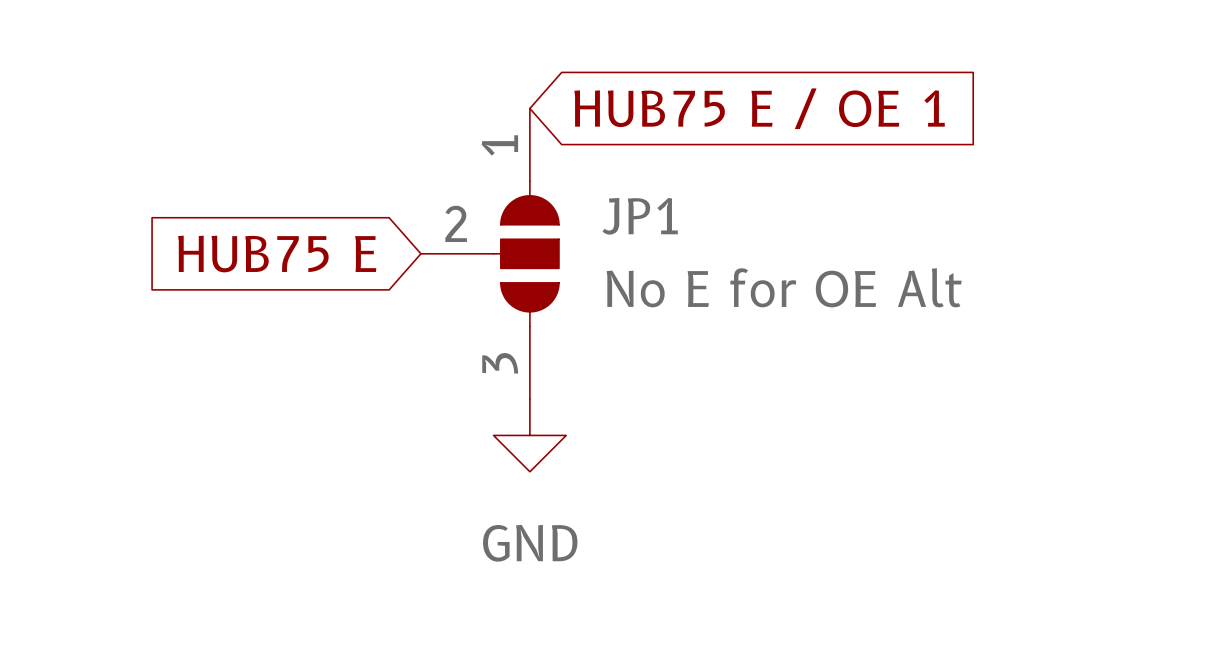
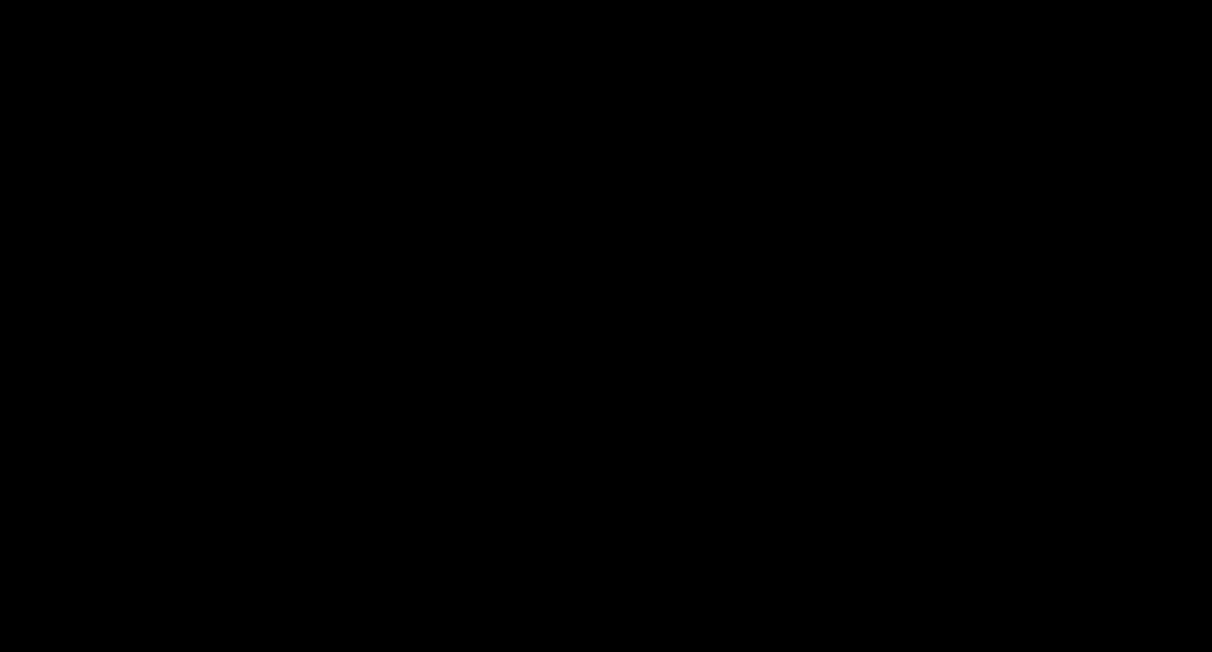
global label: HUB75 E / OE 1 (759, 108) -> none
JP1: No E for OE Alt (489, 253) -> none
global label: HUB75 E (277, 254) -> none
power symbol: GND (529, 435) -> none

